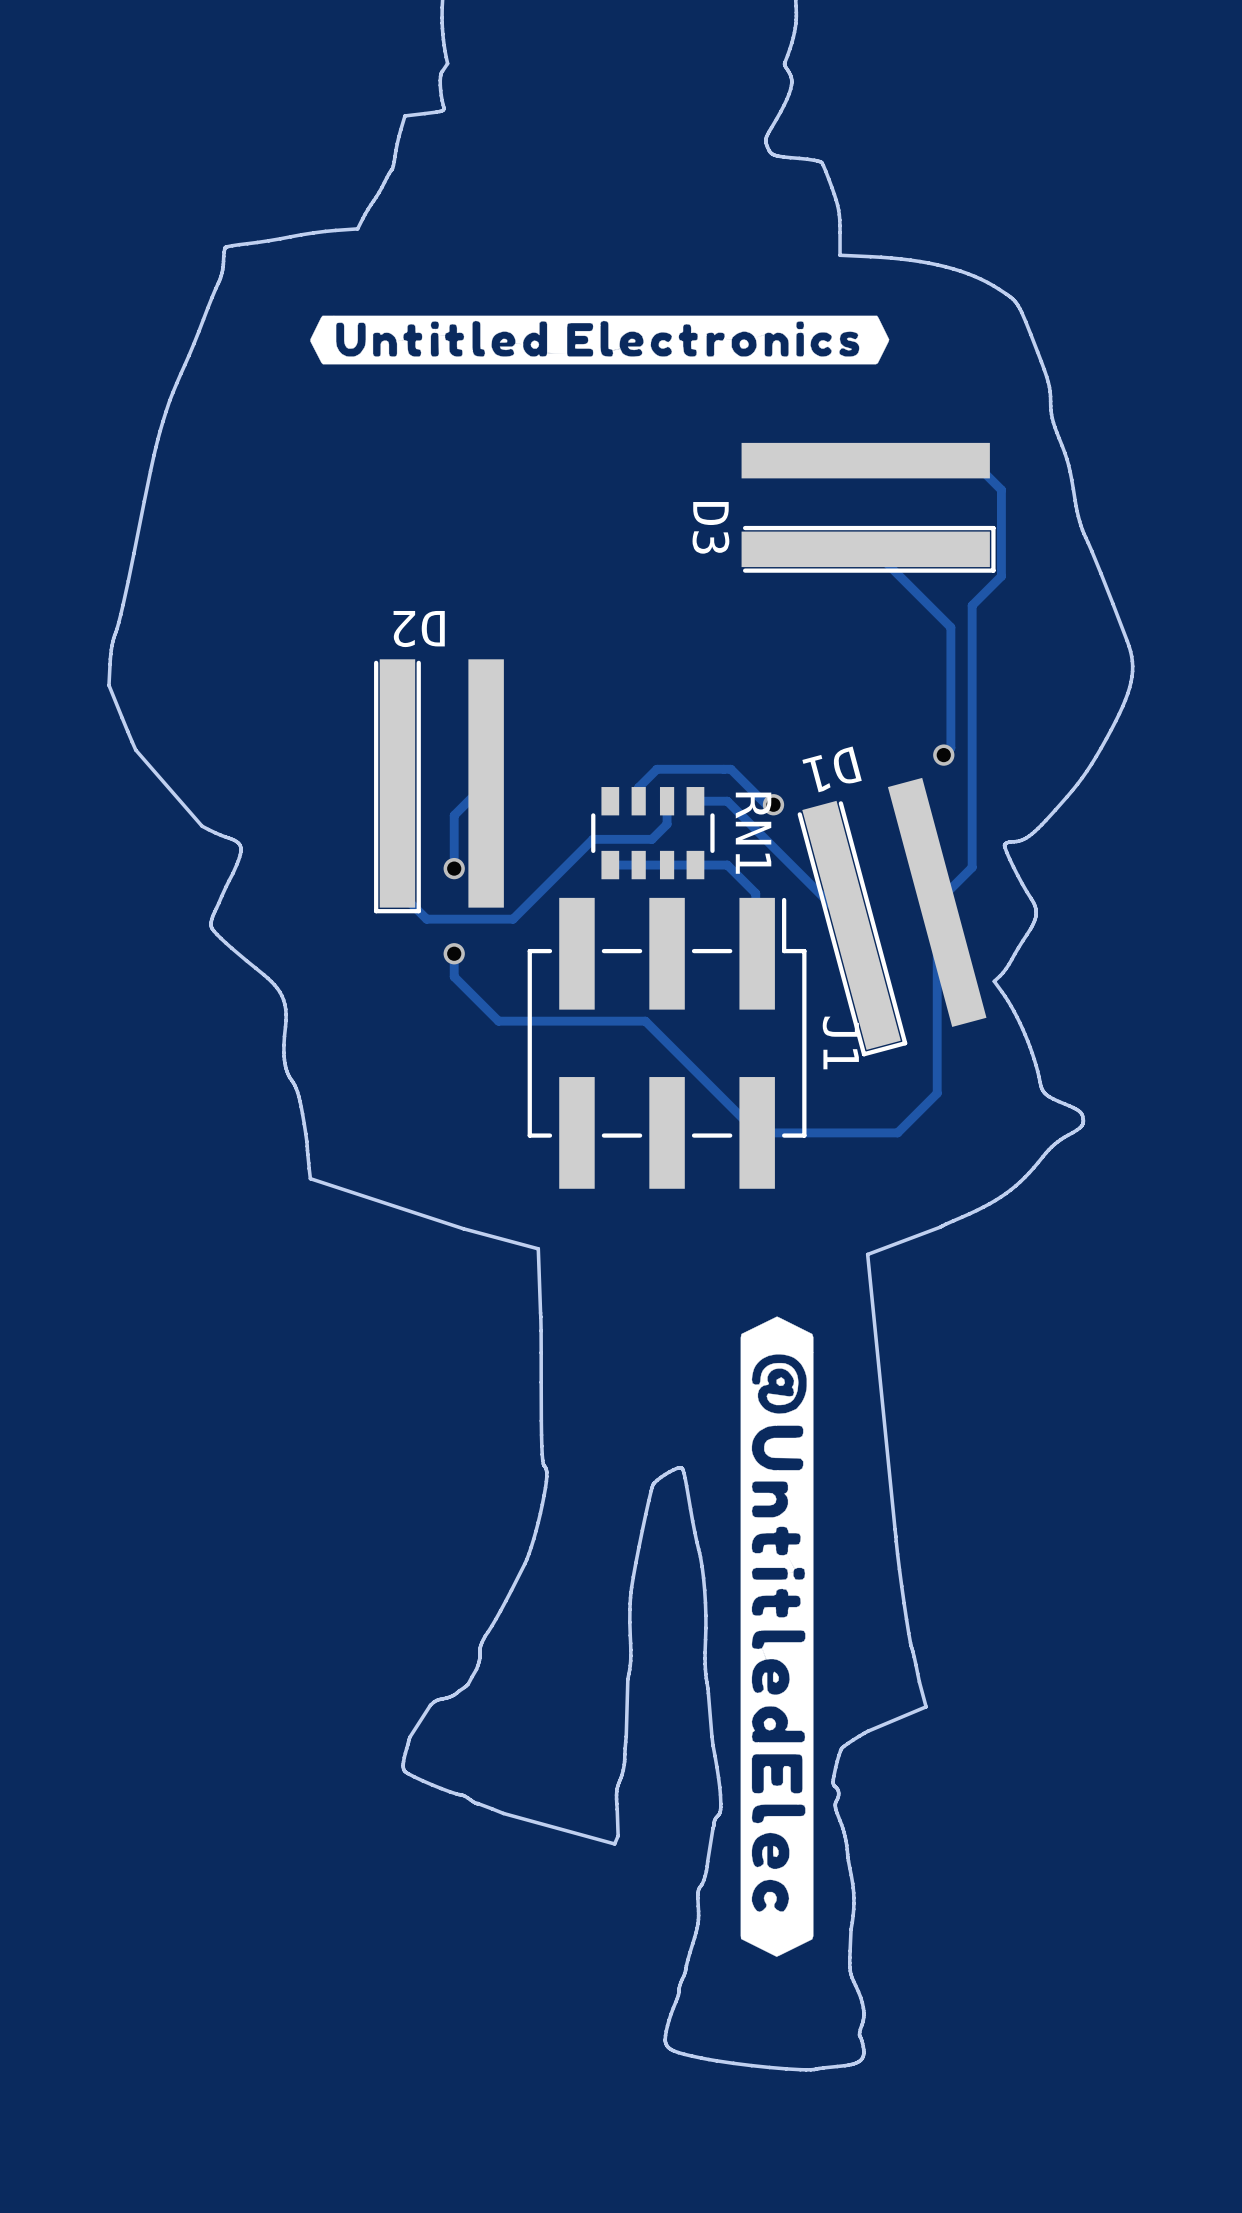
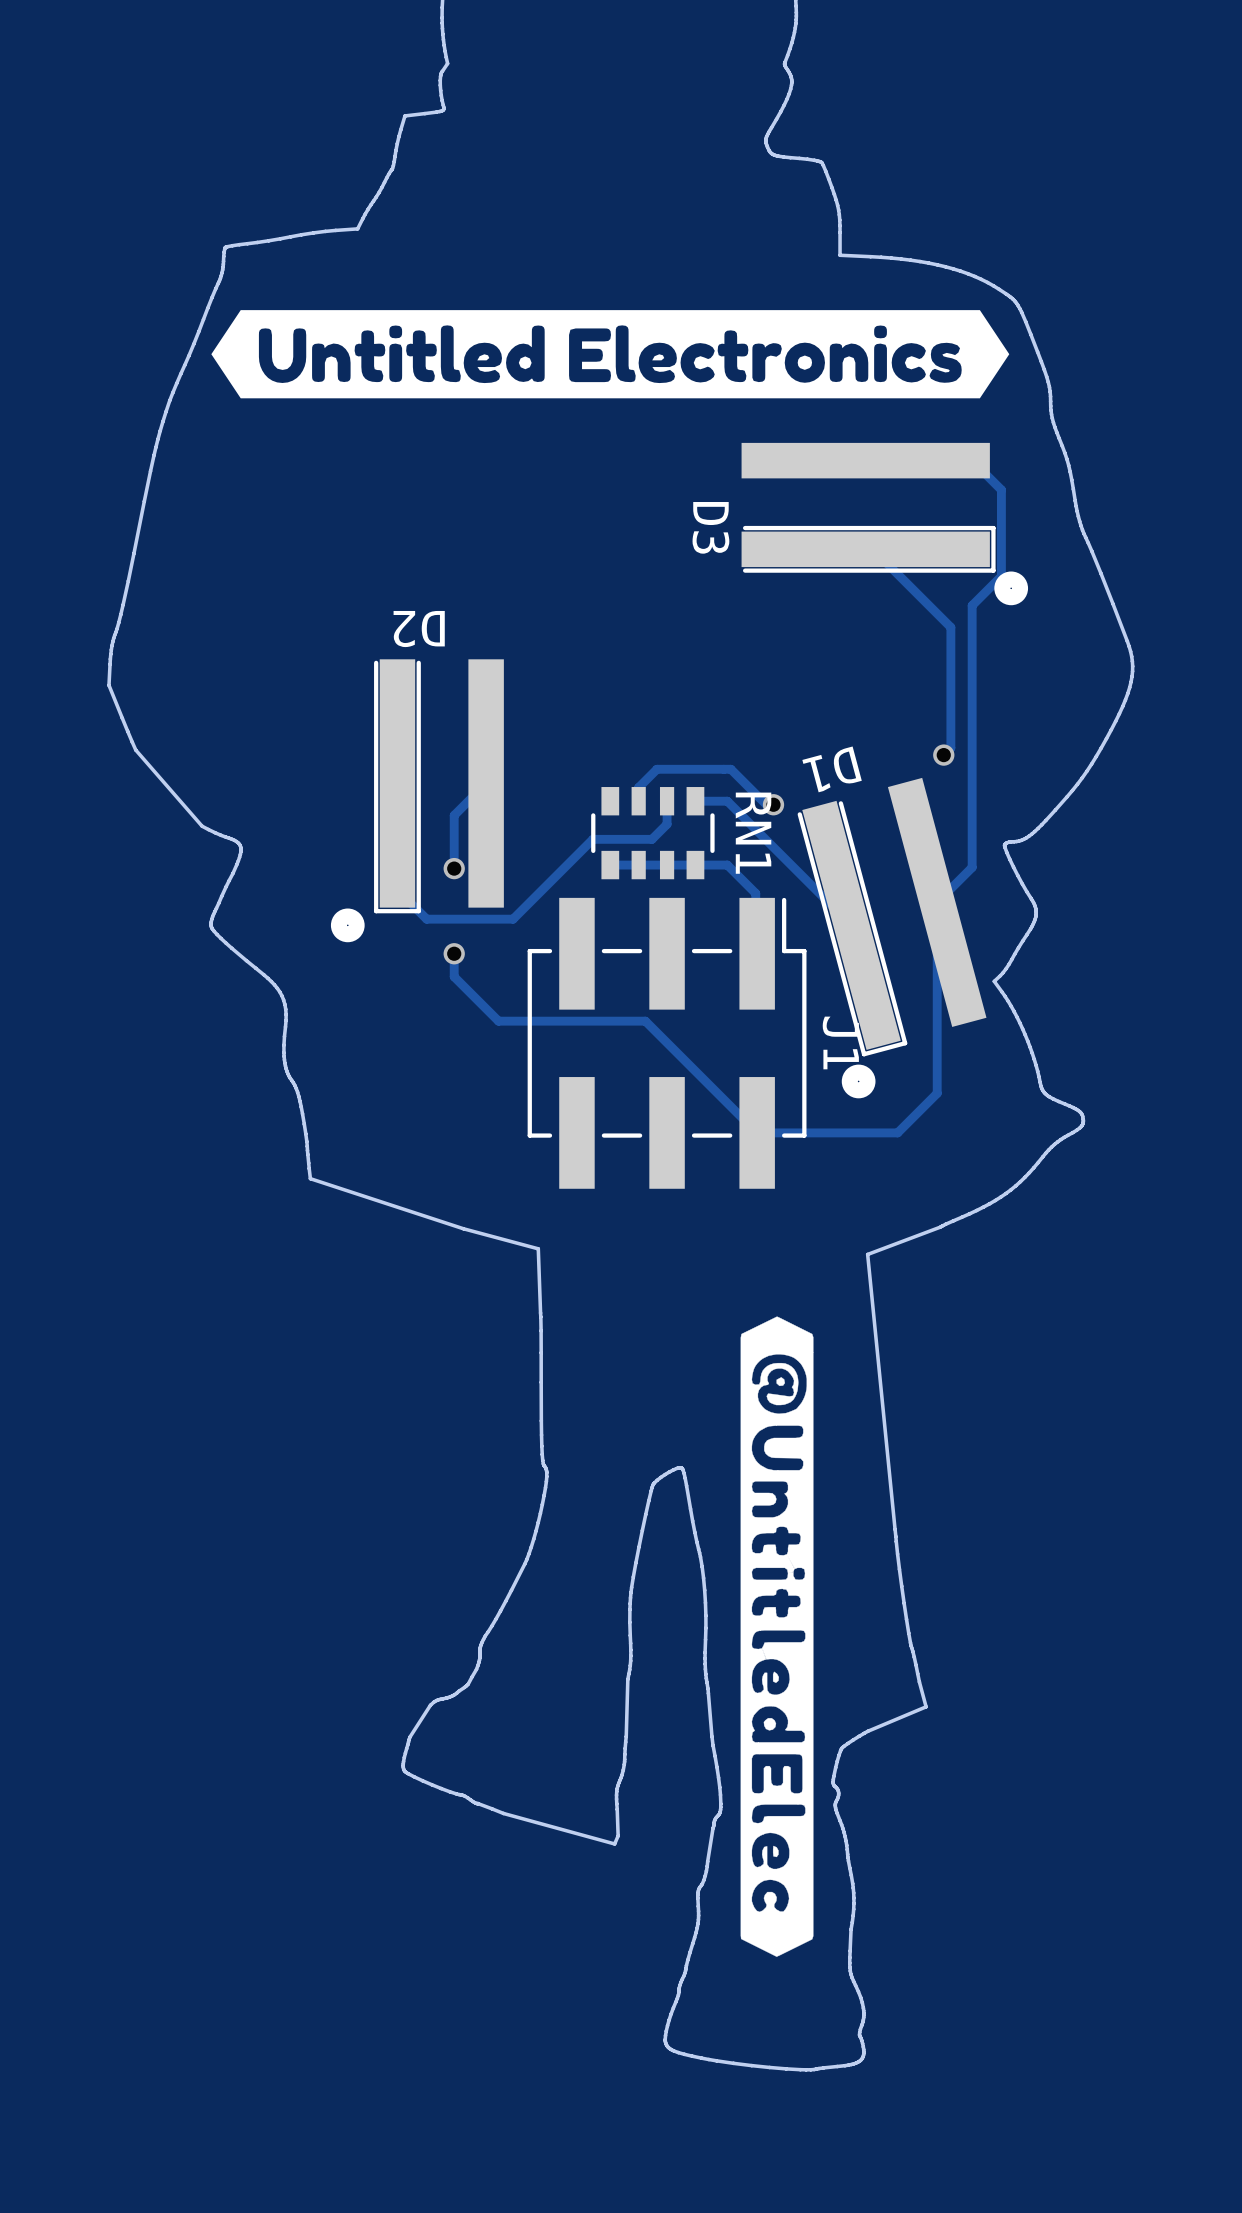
drawing shape: [310, 315, 890, 365] -> [211, 310, 1010, 399]
drawing: none -> [994, 571, 1029, 606]
drawing: none -> [330, 908, 365, 943]
drawing: none -> [841, 1064, 876, 1099]

